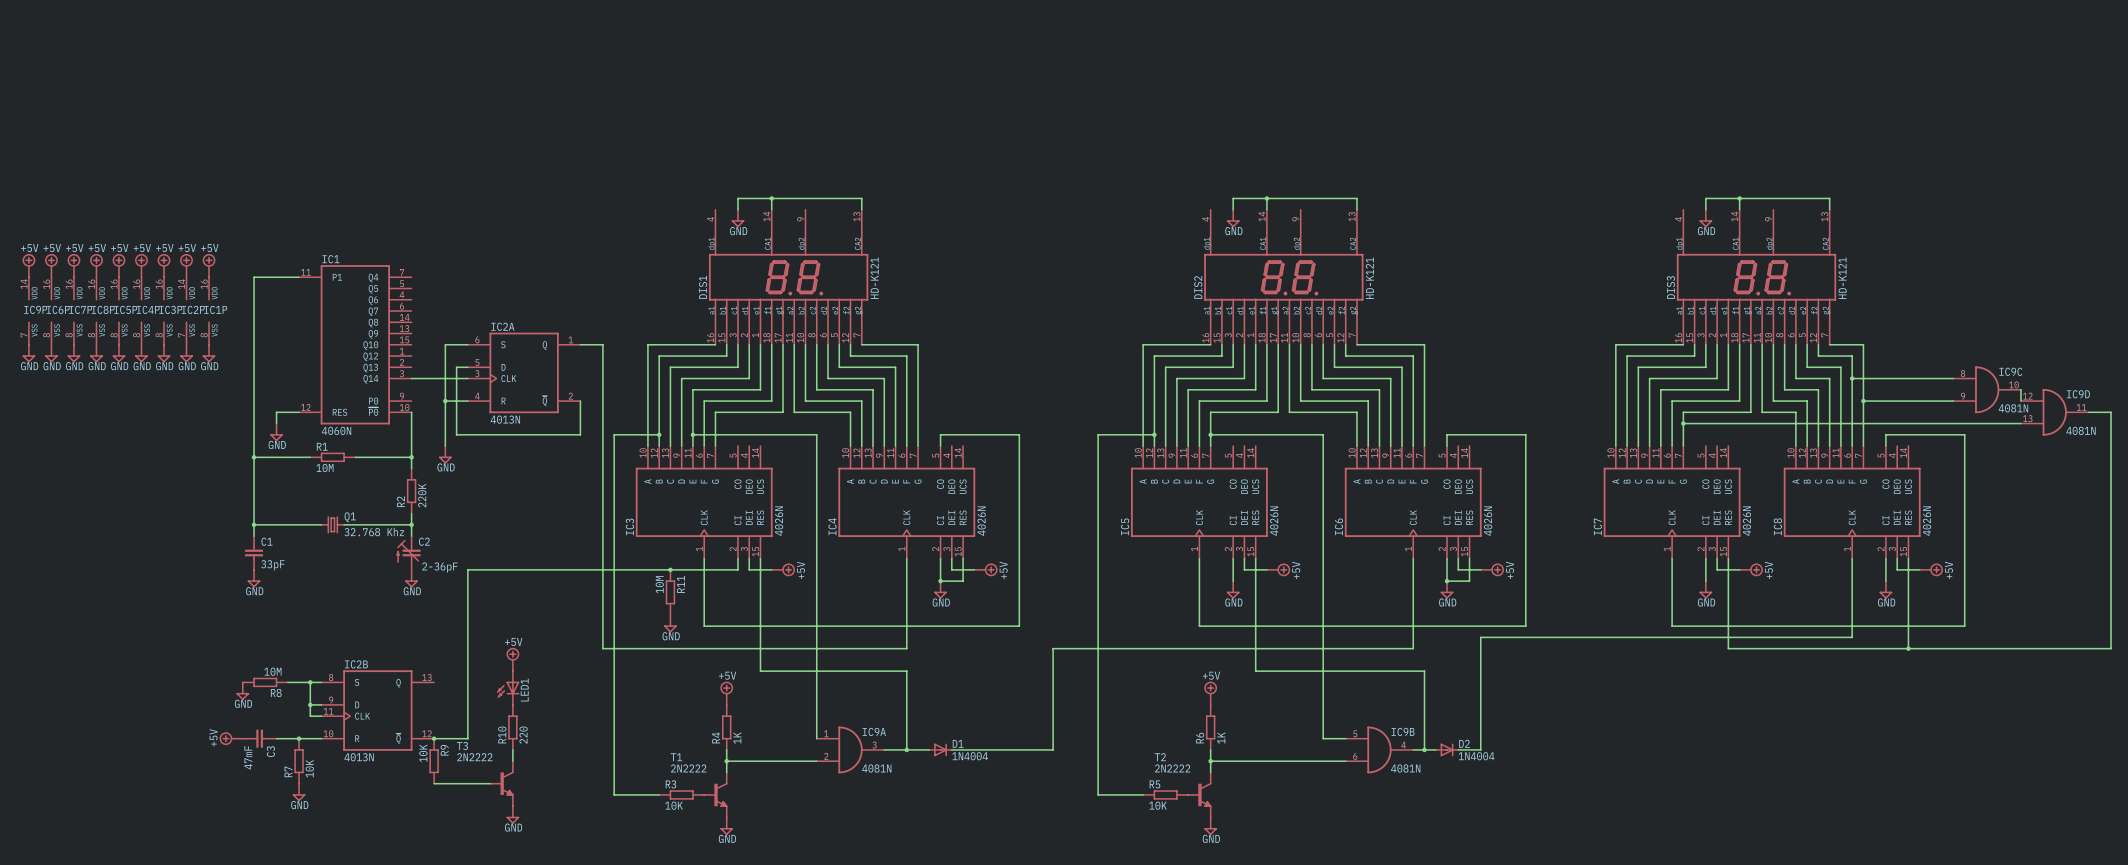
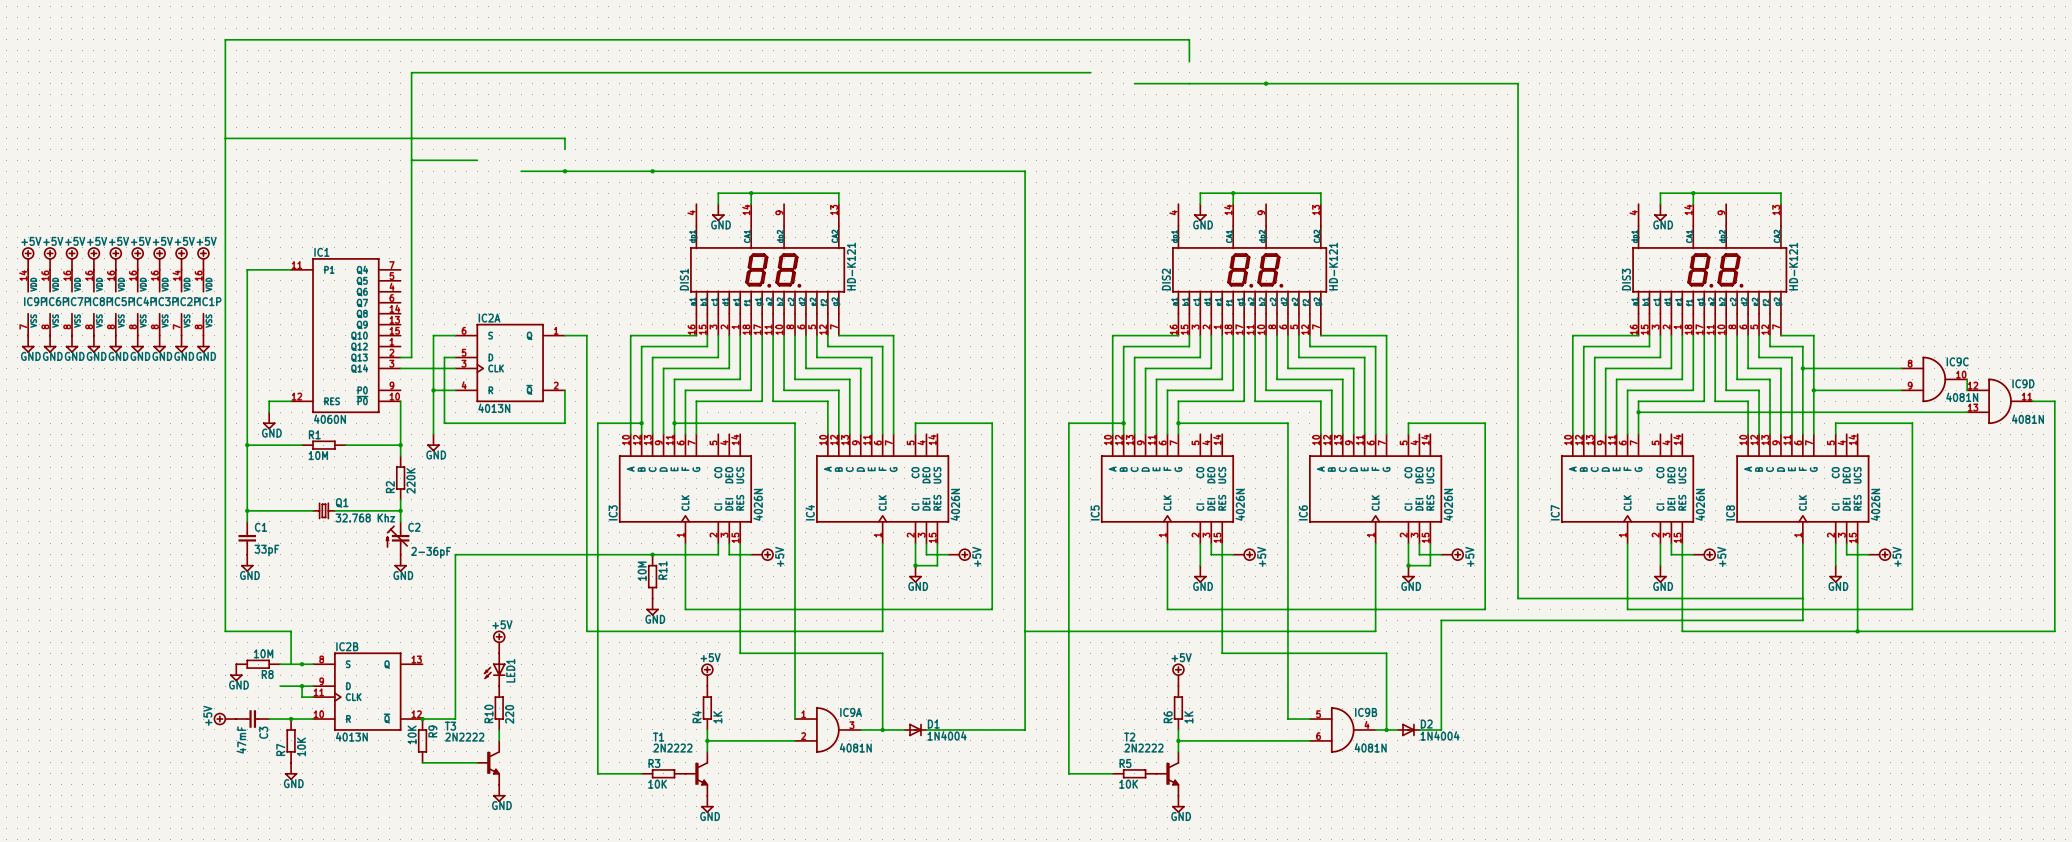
wire: none -> (1189, 61) (1189, 39) (225, 39) (225, 631) (291, 631) (291, 664)
wire: none -> (1090, 72) (411, 72) (411, 357) (400, 357)
wire: none -> (1134, 83) (1518, 83) (1518, 598) (1802, 598)
junction: none -> (1266, 83)
wire: none -> (225, 138) (564, 138) (564, 149)
wire: none -> (411, 160) (477, 160)
wire: none -> (521, 171) (1025, 171) (1025, 631)
junction: none -> (564, 171)
junction: none -> (652, 171)
wire: (310, 682) (310, 704) -> (280, 686) (302, 686)

